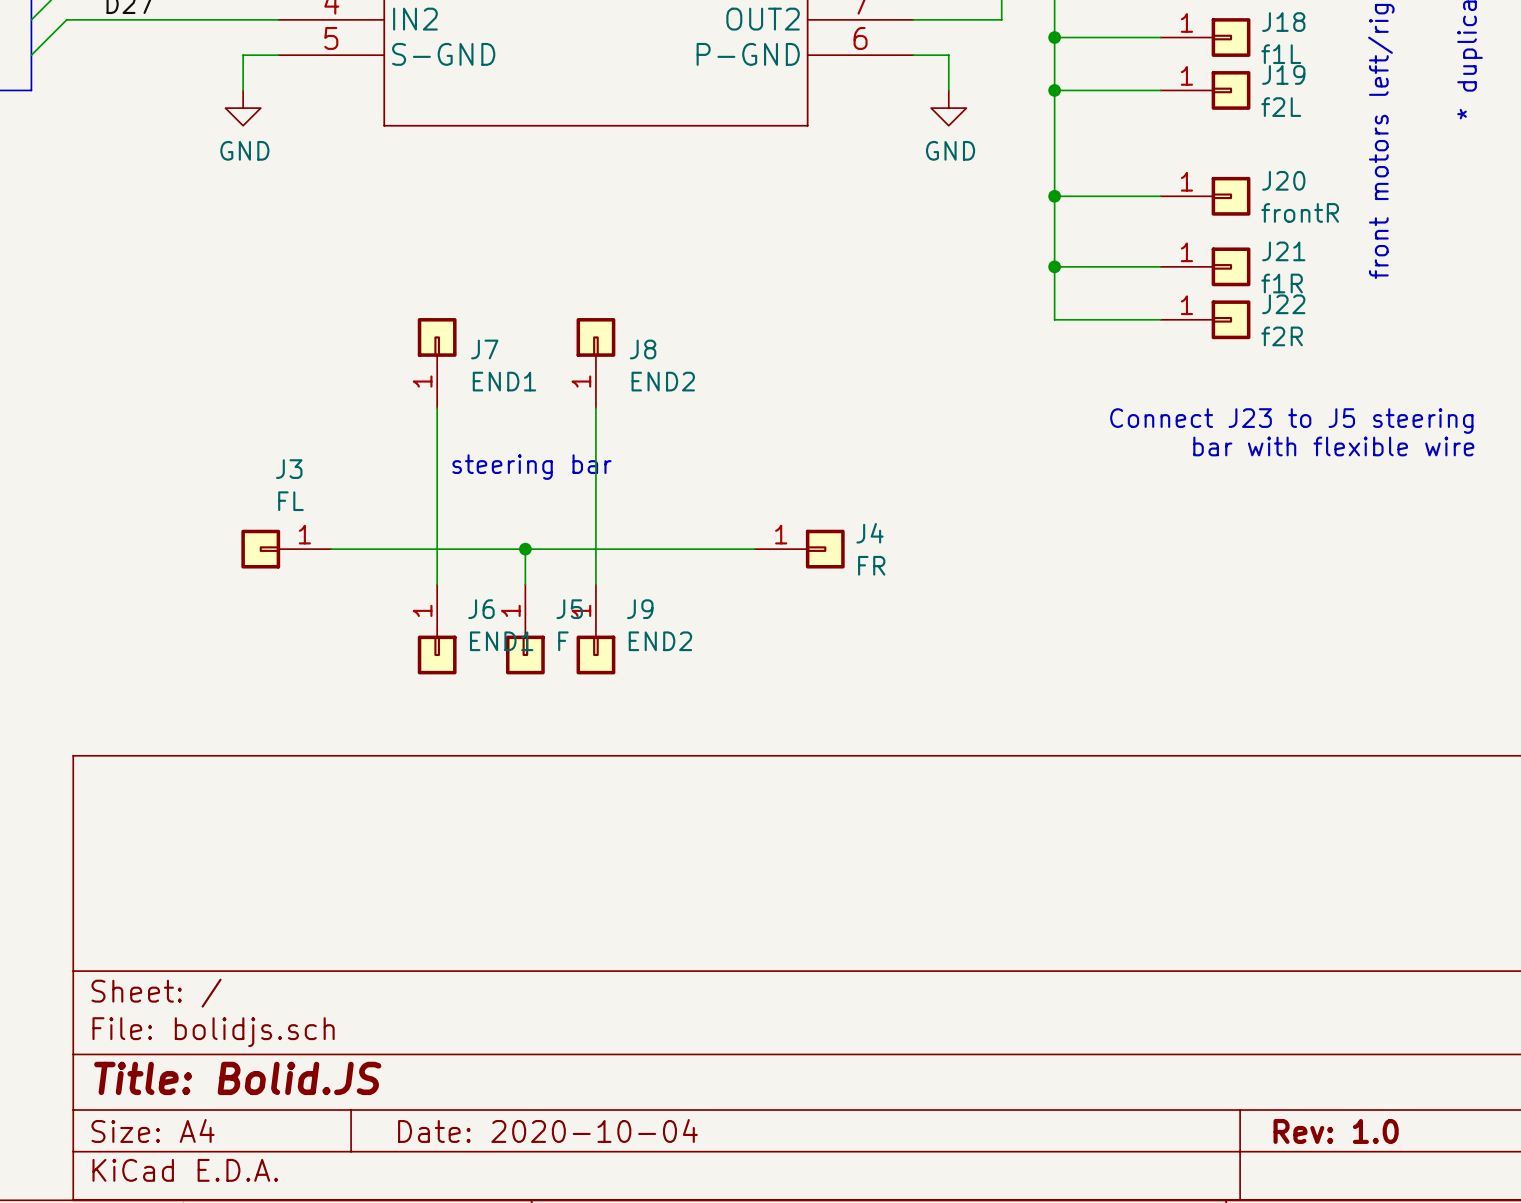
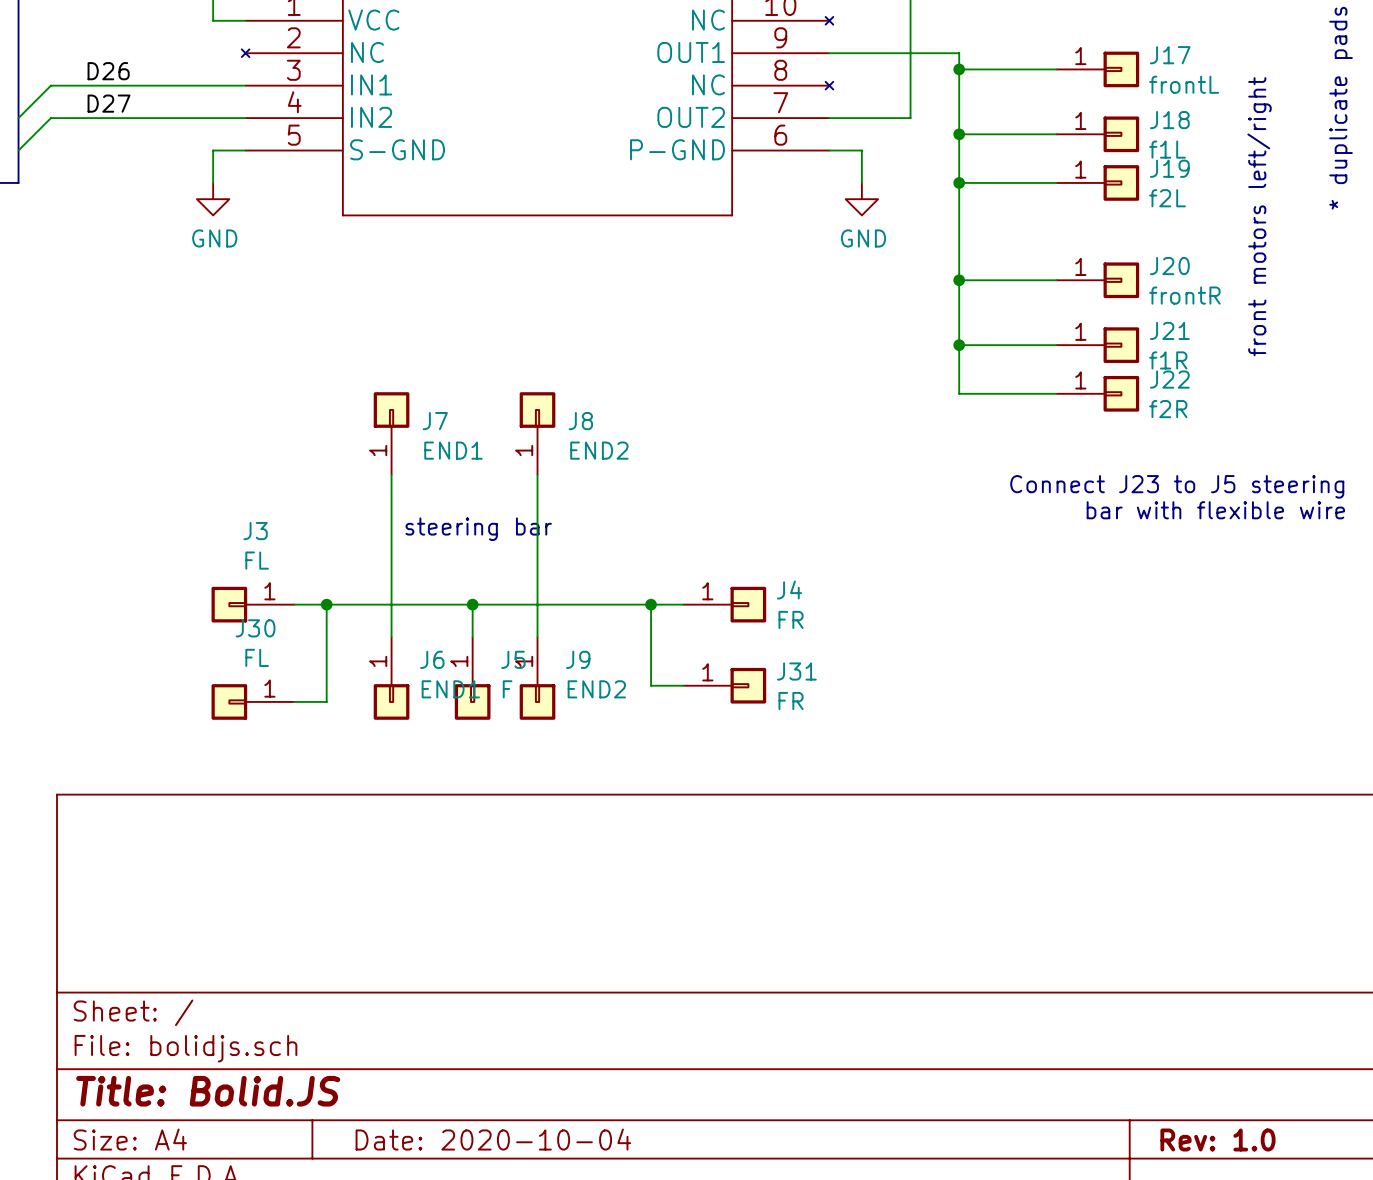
wire: none -> (326, 604) (326, 701) (294, 701)
junction: none -> (326, 604)
wire: none -> (651, 604) (651, 685) (683, 685)
junction: none -> (651, 604)
J31: none -> FR (724, 685)
J30: none -> FL (252, 701)

